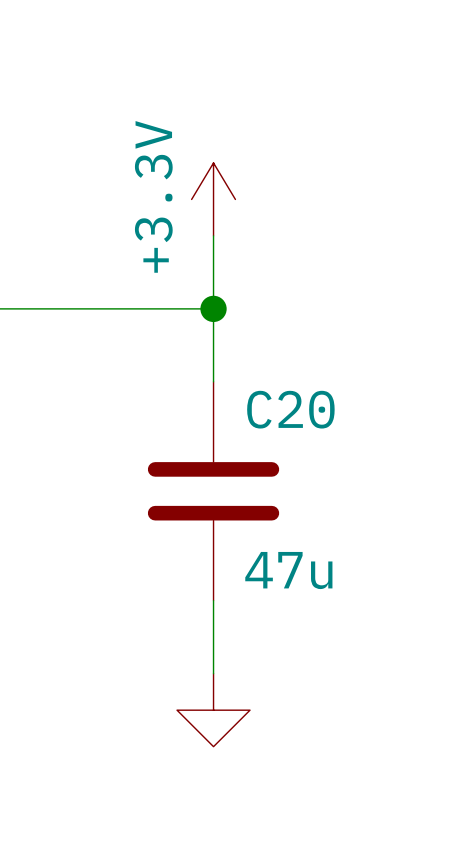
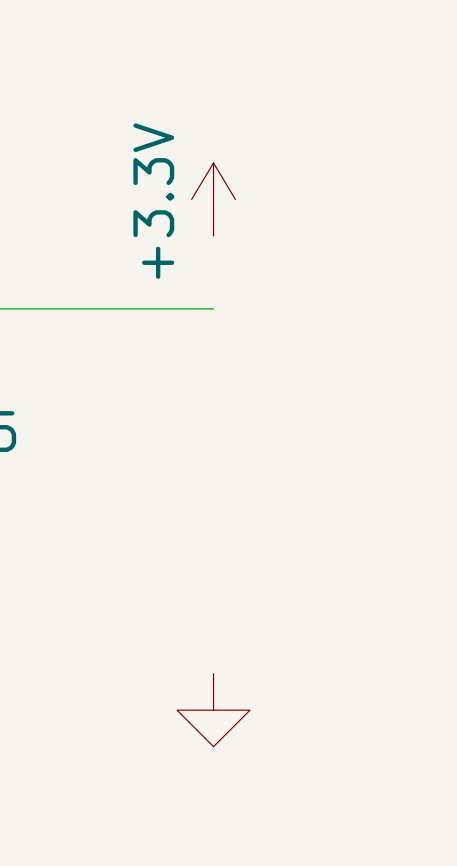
wire: (213, 235) (213, 381) -> none
junction: (213, 308) -> none
C20: 47u (213, 491) -> none
wire: (213, 600) (213, 673) -> none

